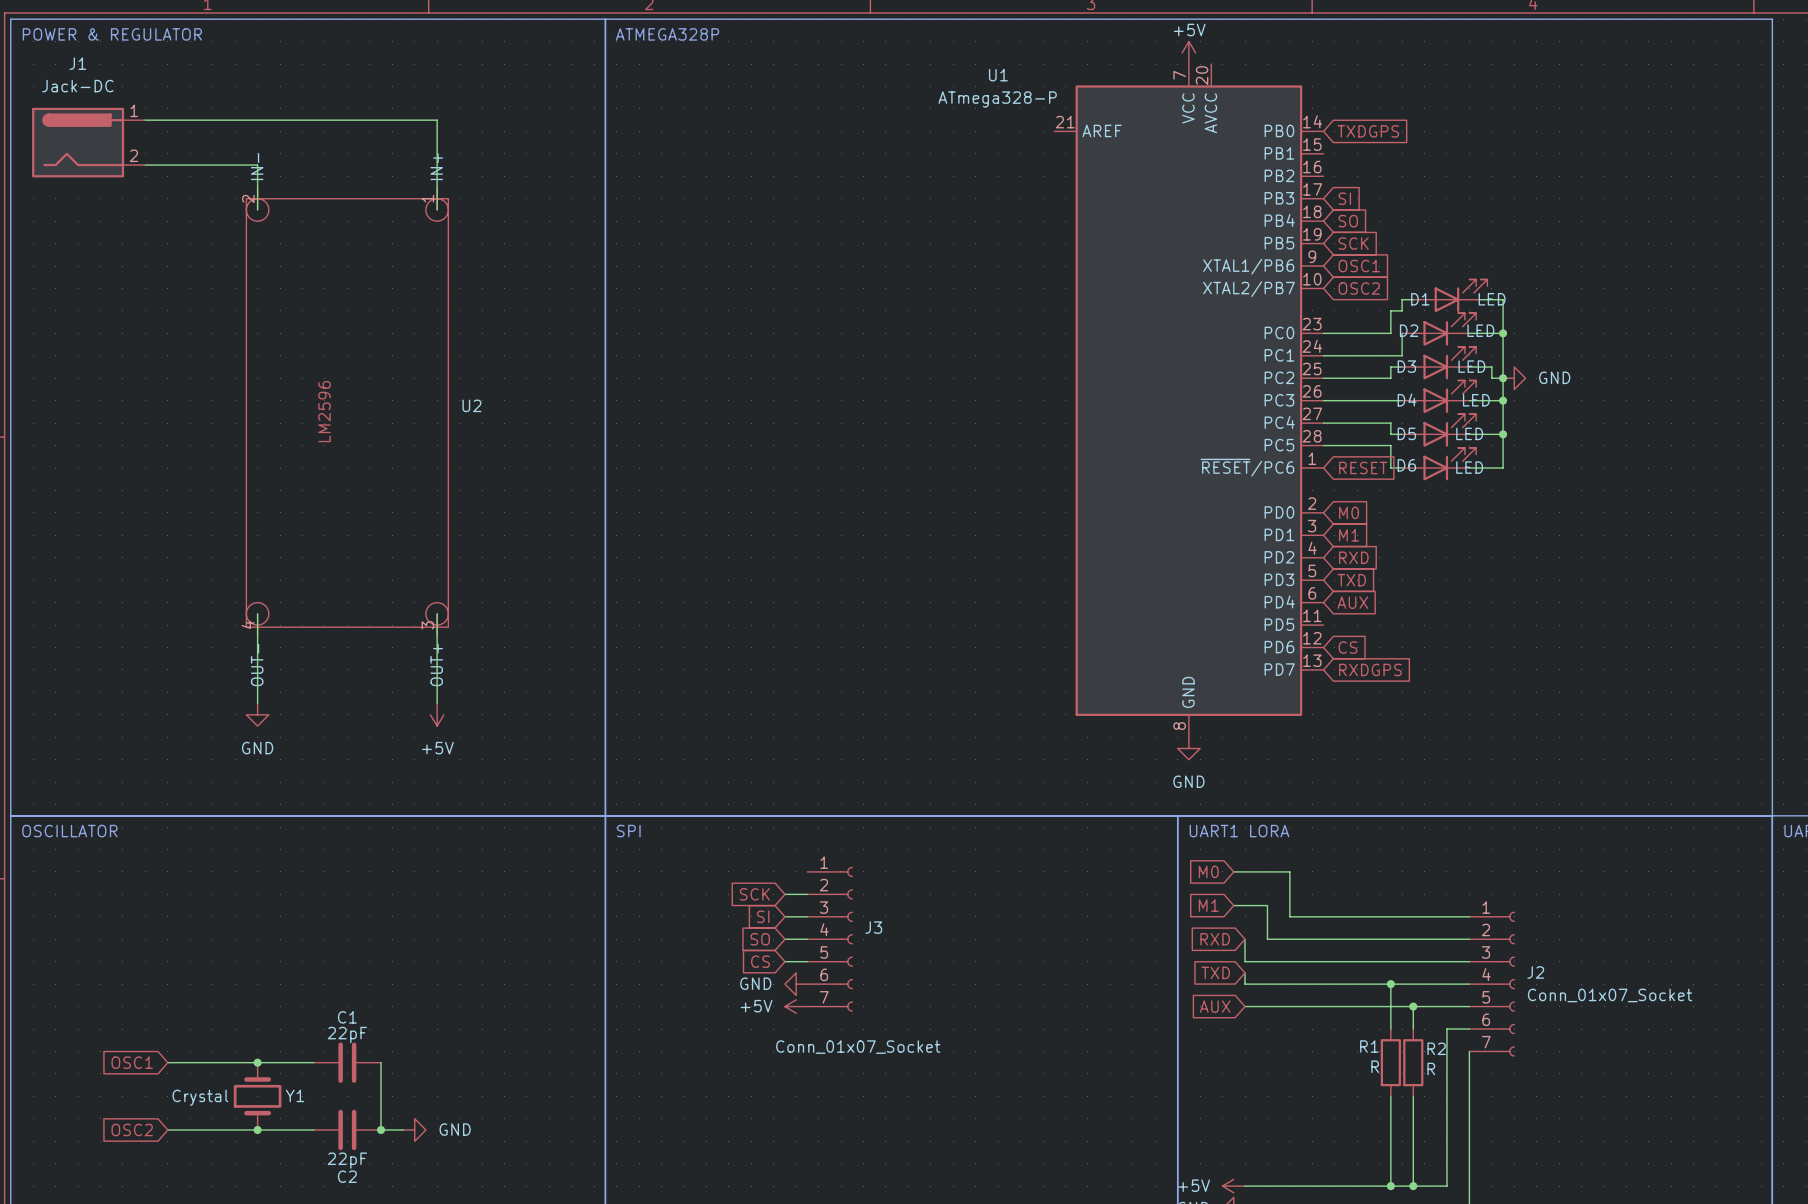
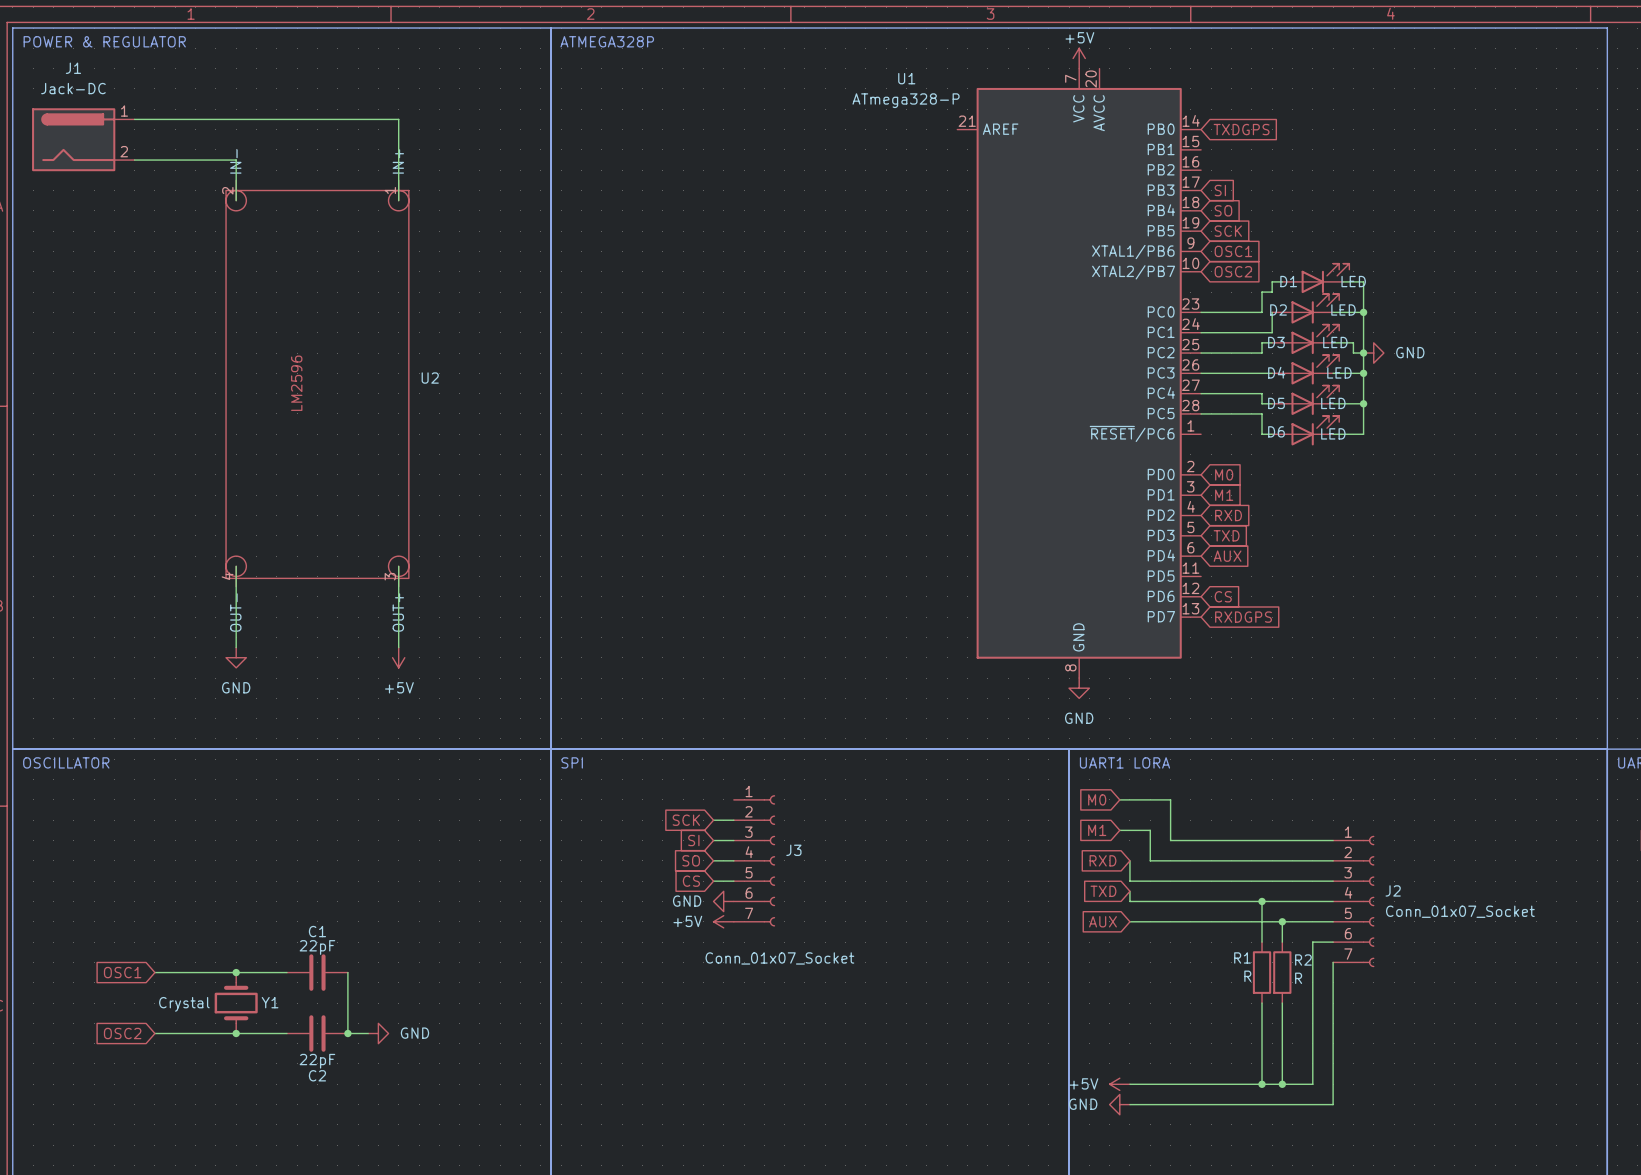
global label: RESET (1363, 468) -> none

